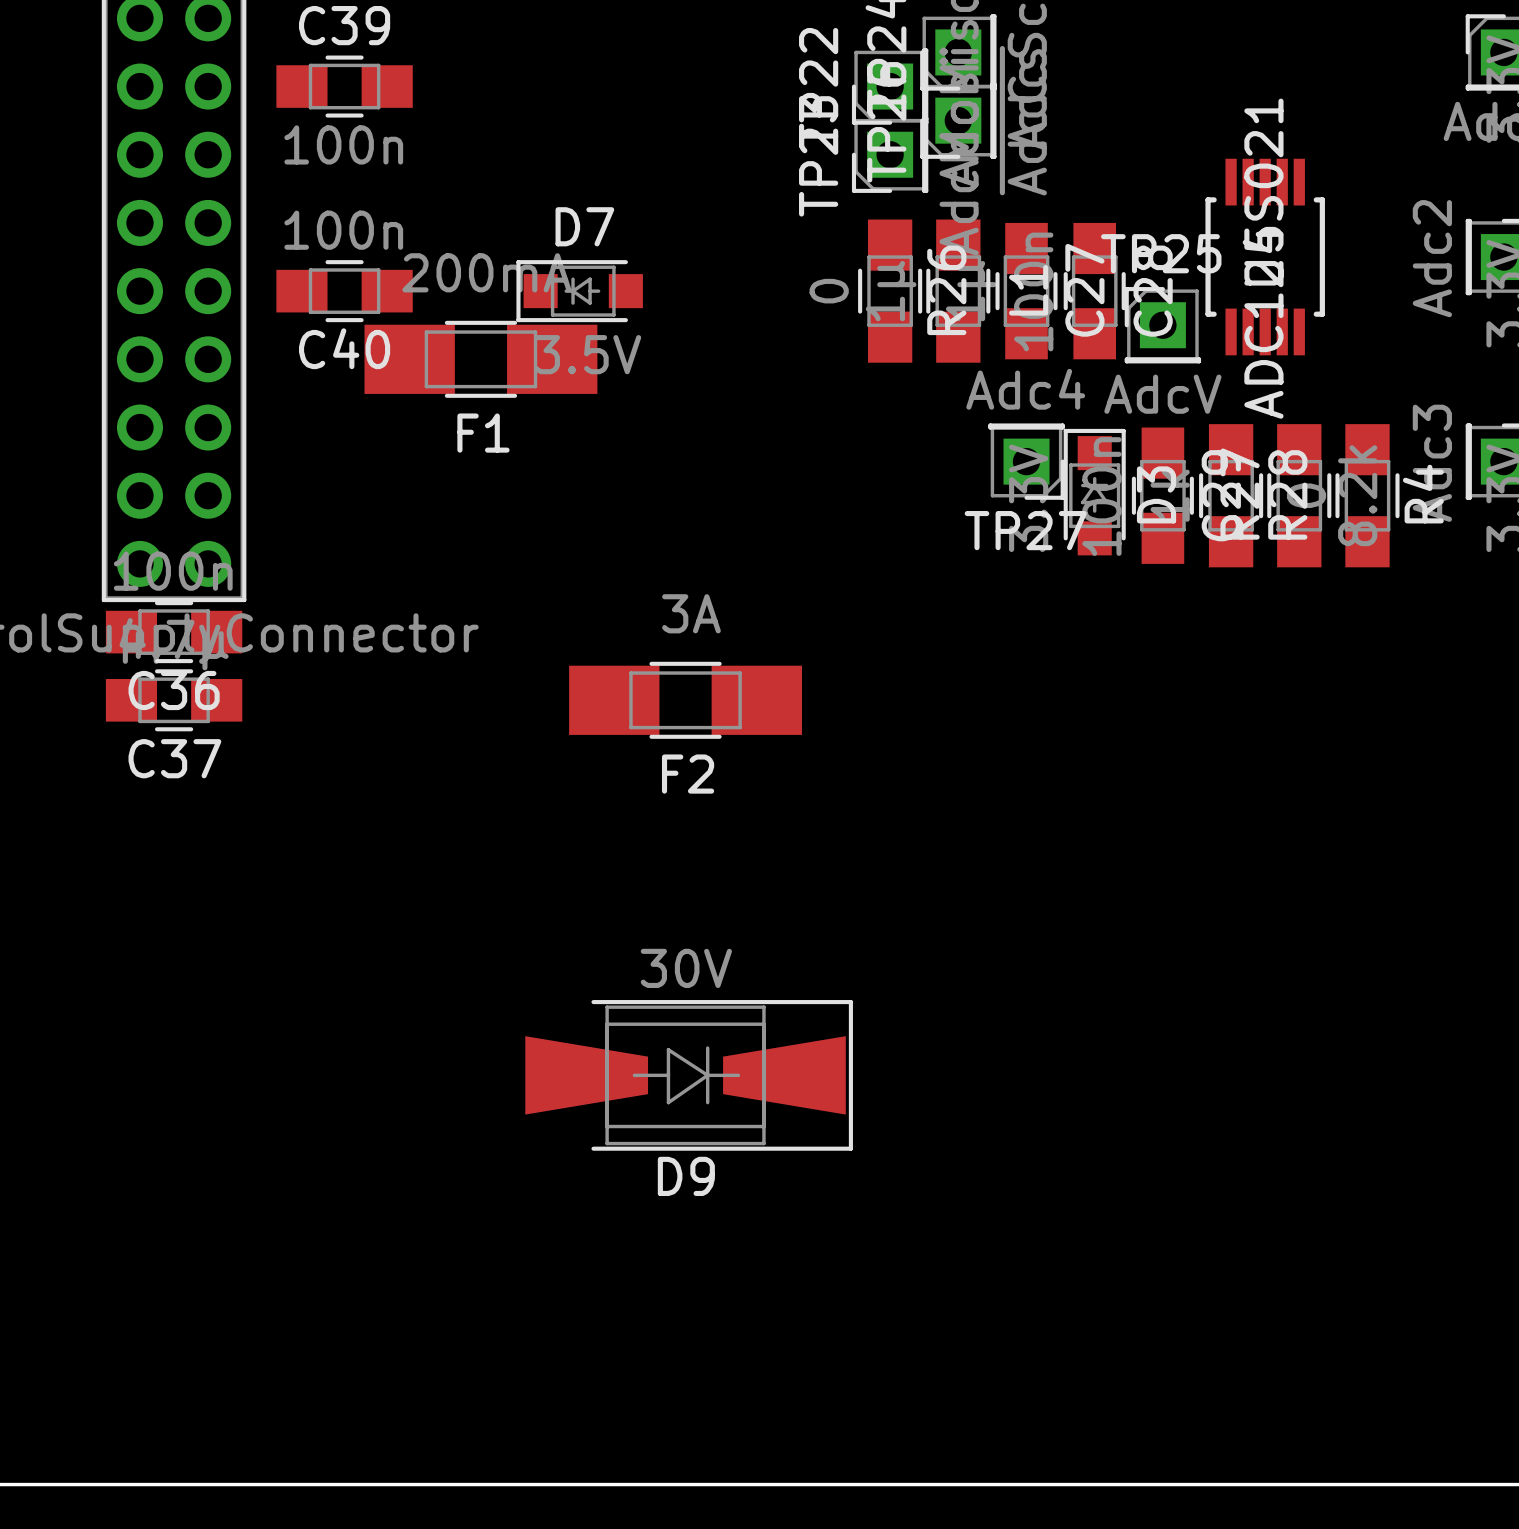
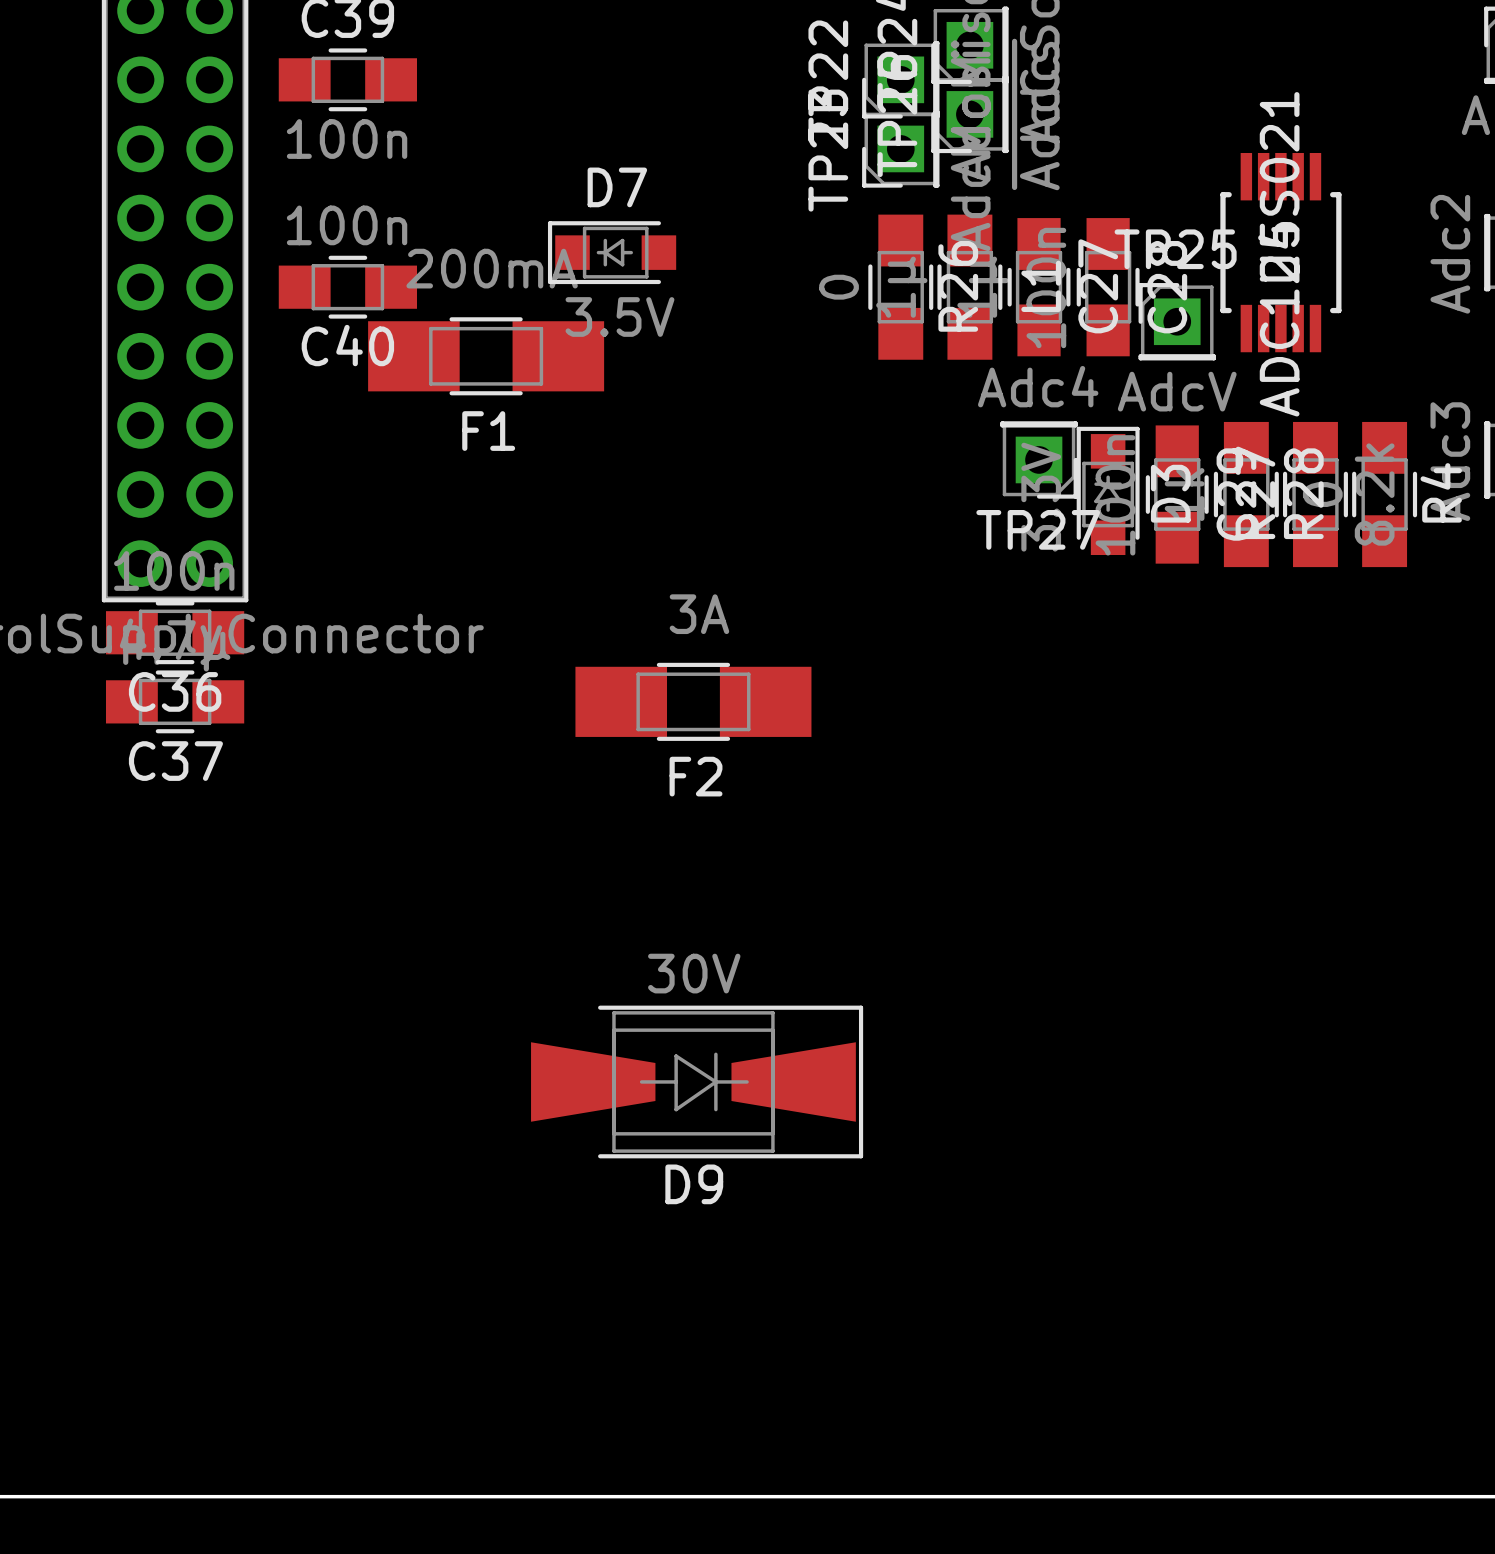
D7 position: (579, 291) -> (612, 252)

